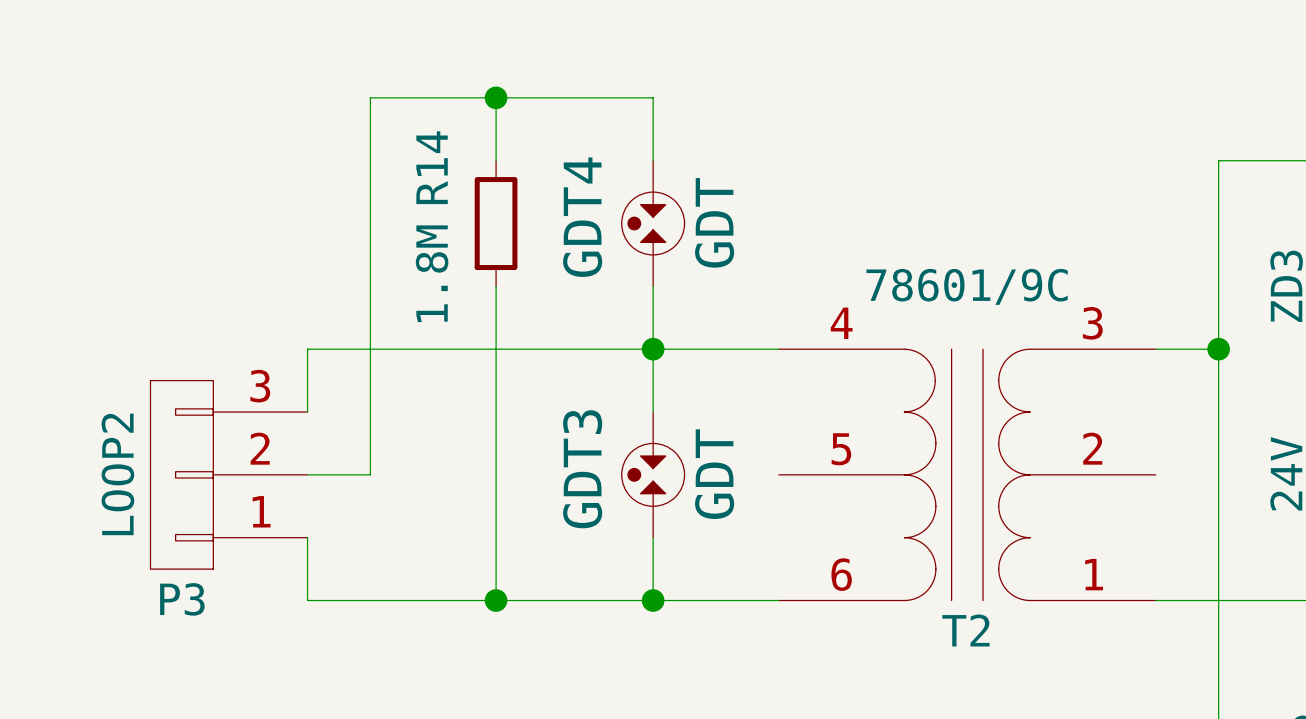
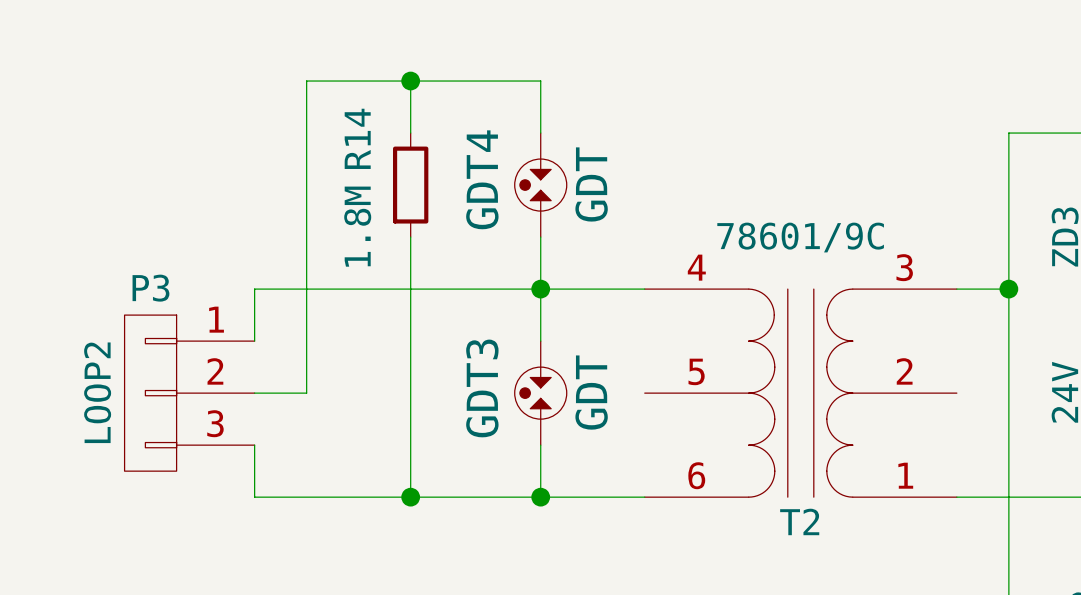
P3 flip: as is (181, 474) -> up-down (150, 393)

